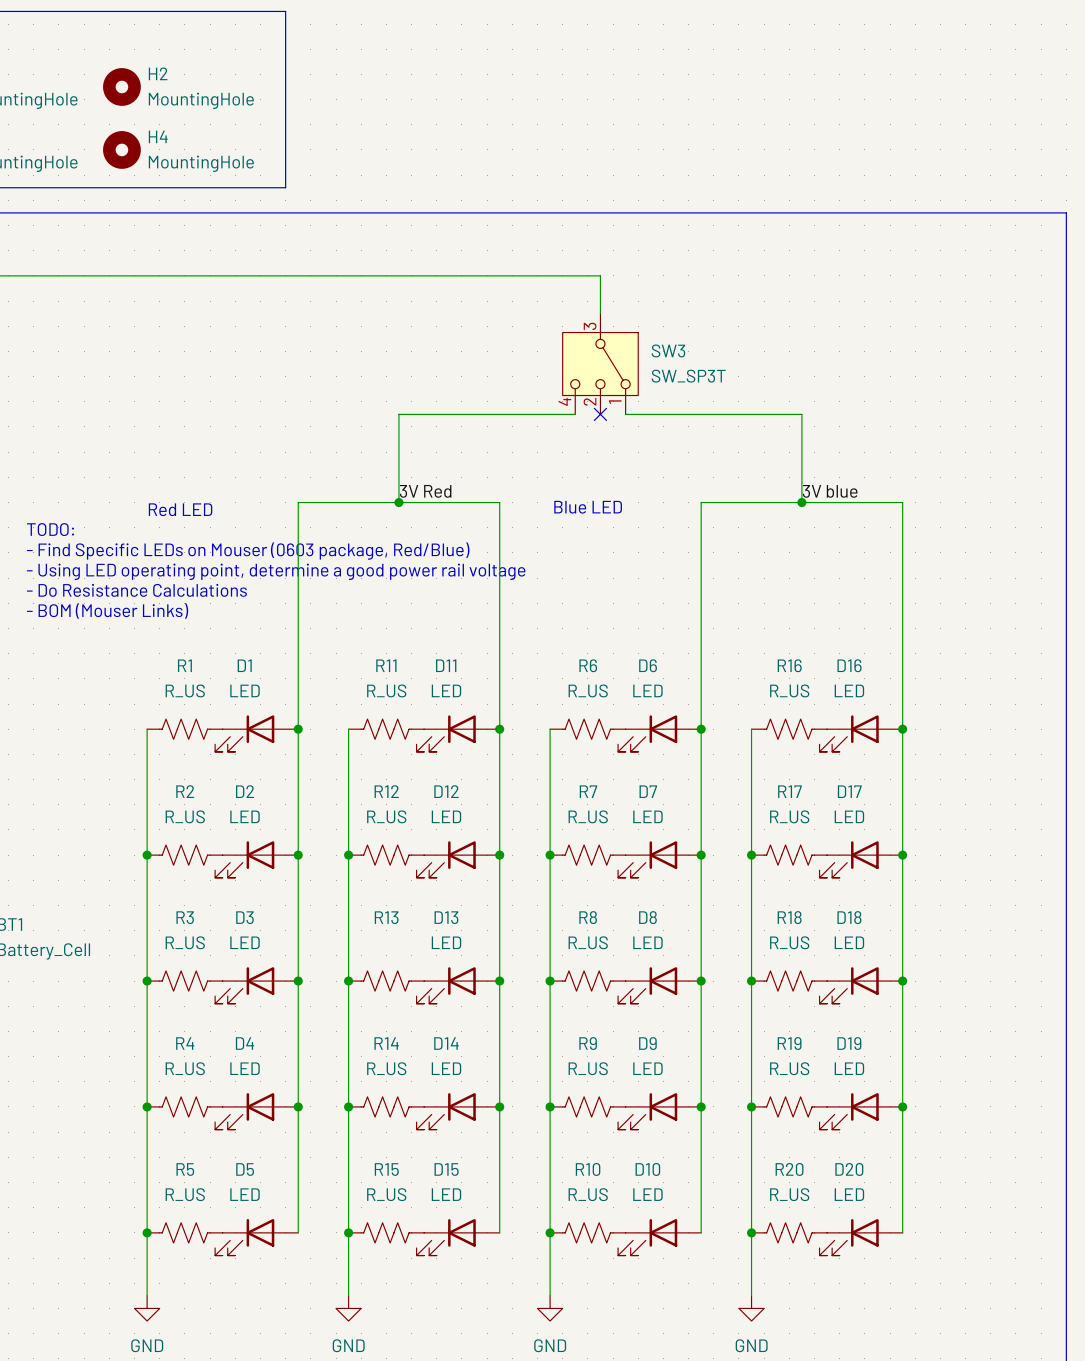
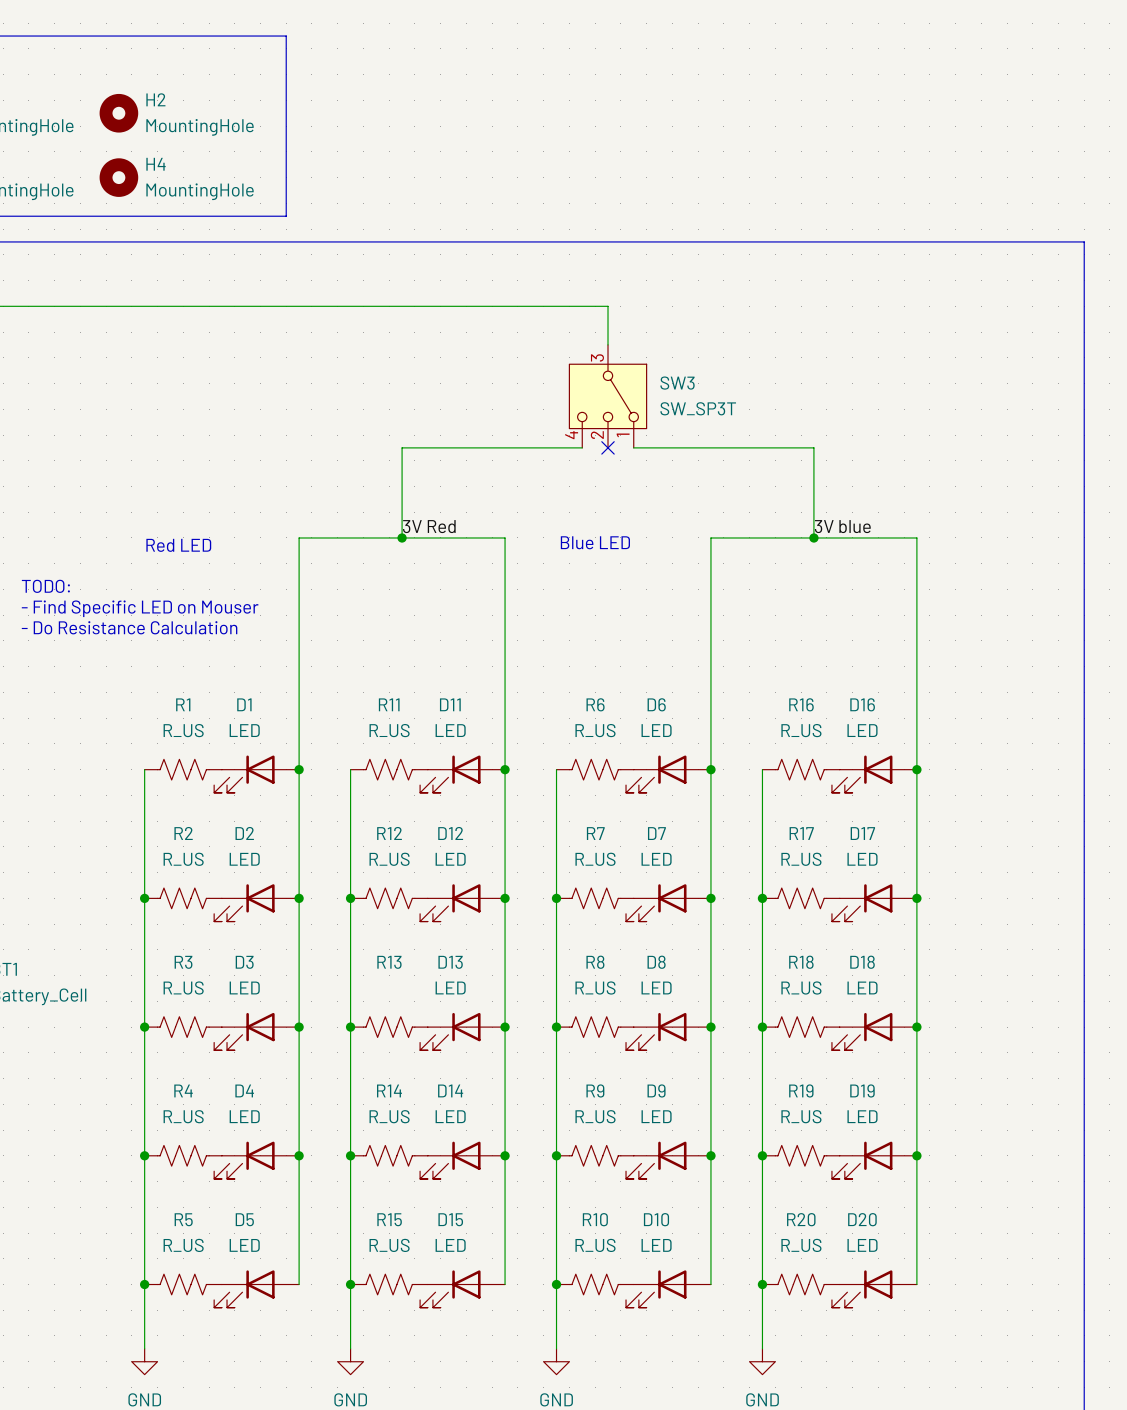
text: TODO: (50, 529) -> none
text: - Find Specific LEDs on Mouser (0603 package, Red/Blue) (248, 551) -> TODO: (45, 586)
text: - Using LED operating point, determine a good power rail voltage (276, 571) -> - Find Specific LED on Mouser (140, 608)
text: - Do Resistance Calculations (136, 590) -> - Do Resistance Calculation (129, 627)
text: - BOM (Mouser Links) (107, 611) -> none

